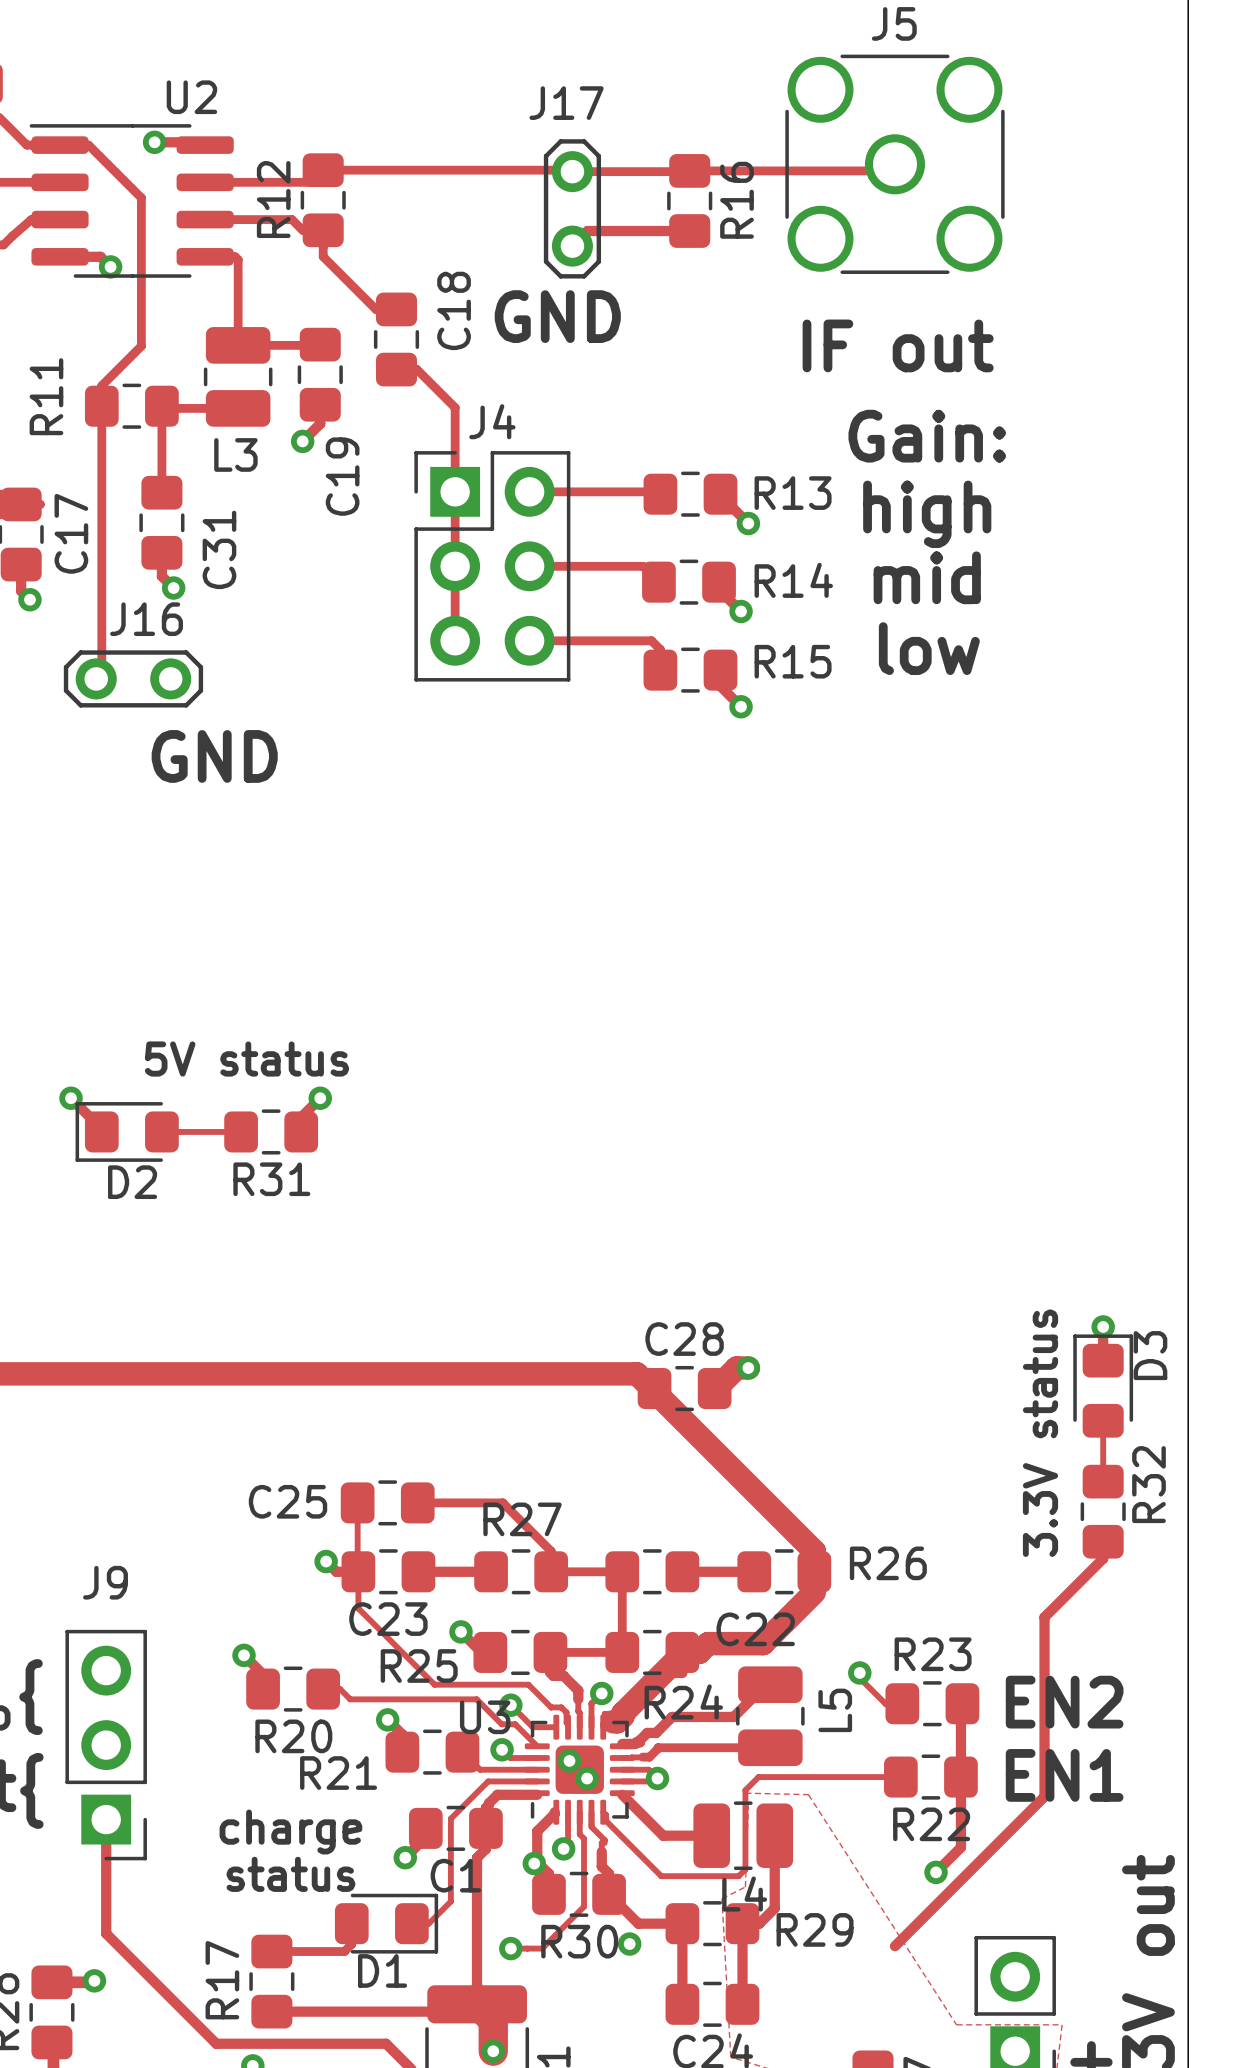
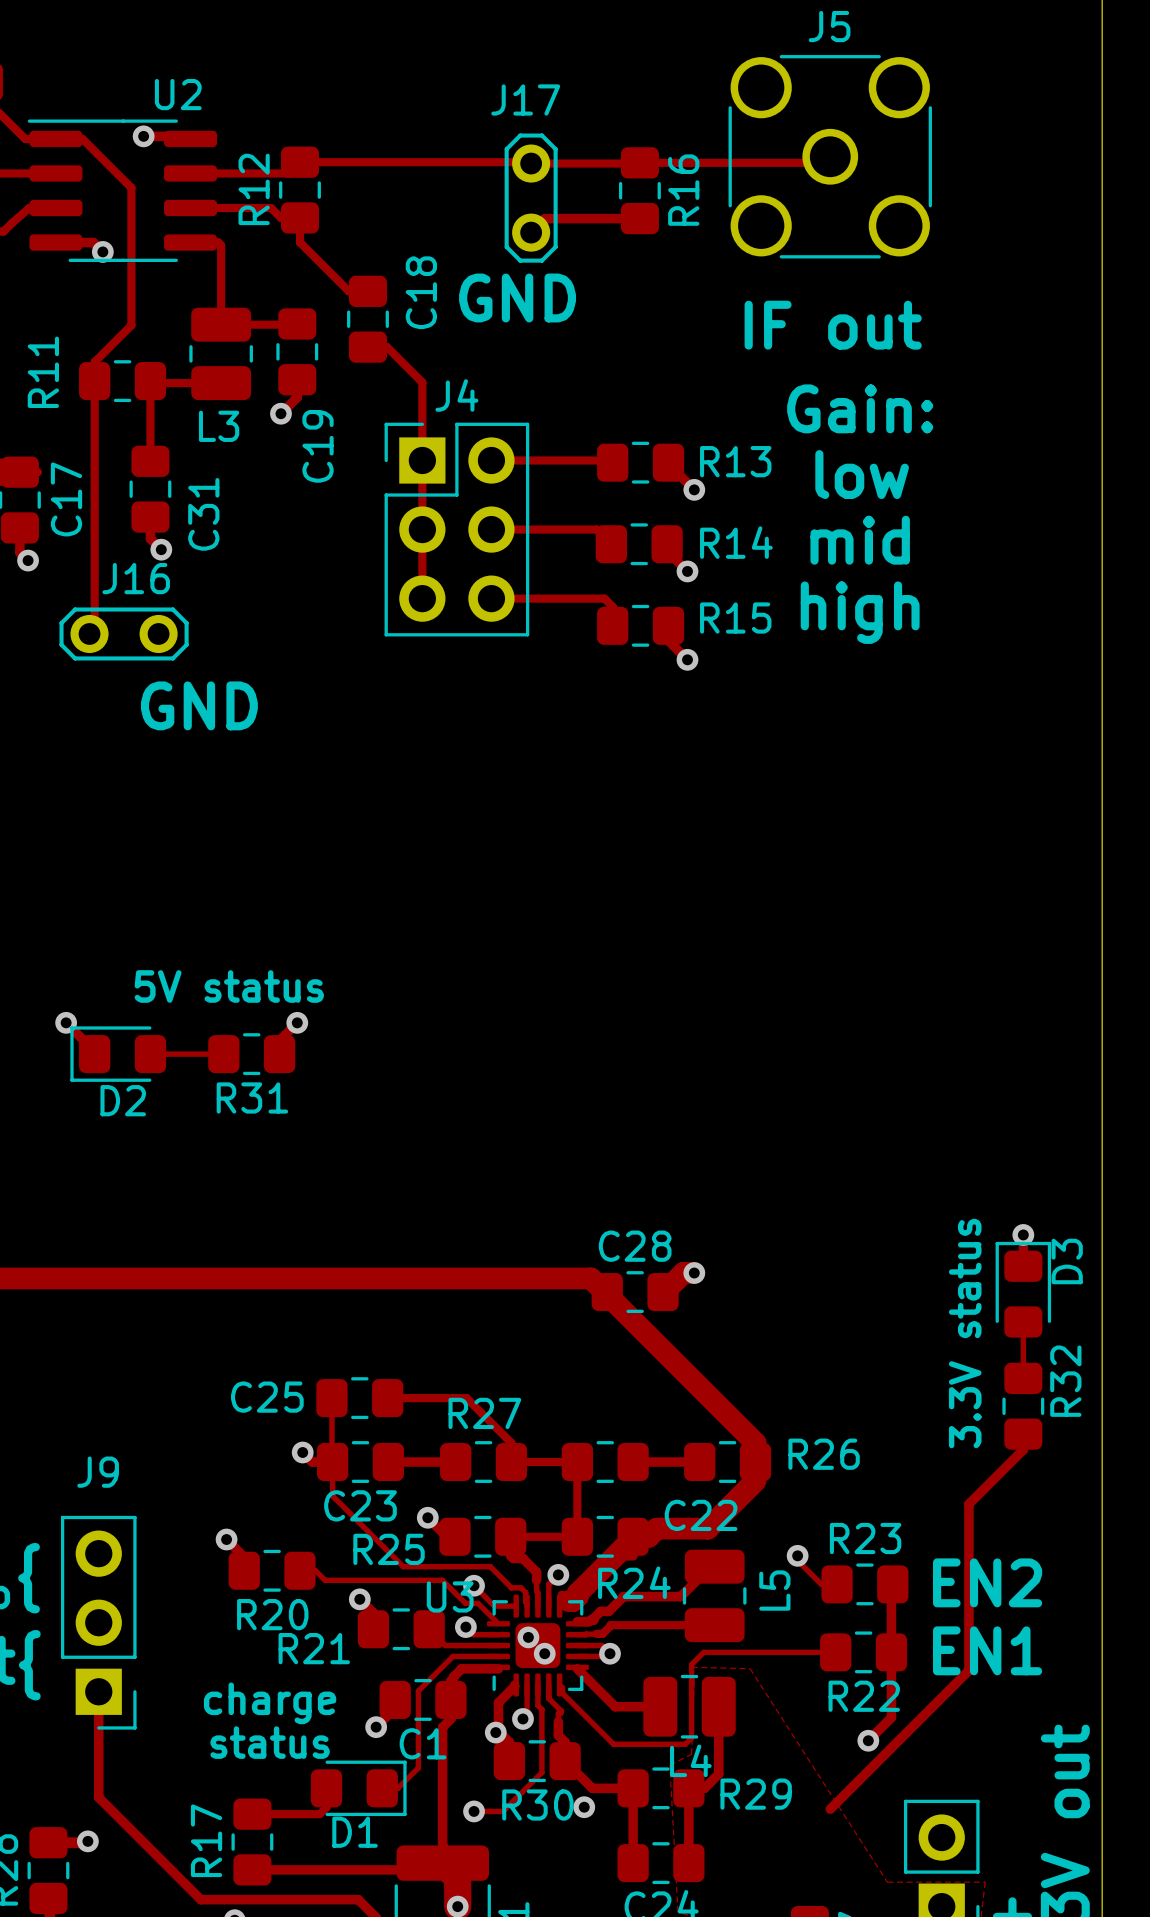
text: high (927, 514) -> low (862, 474)
text: low (929, 648) -> high (860, 612)

